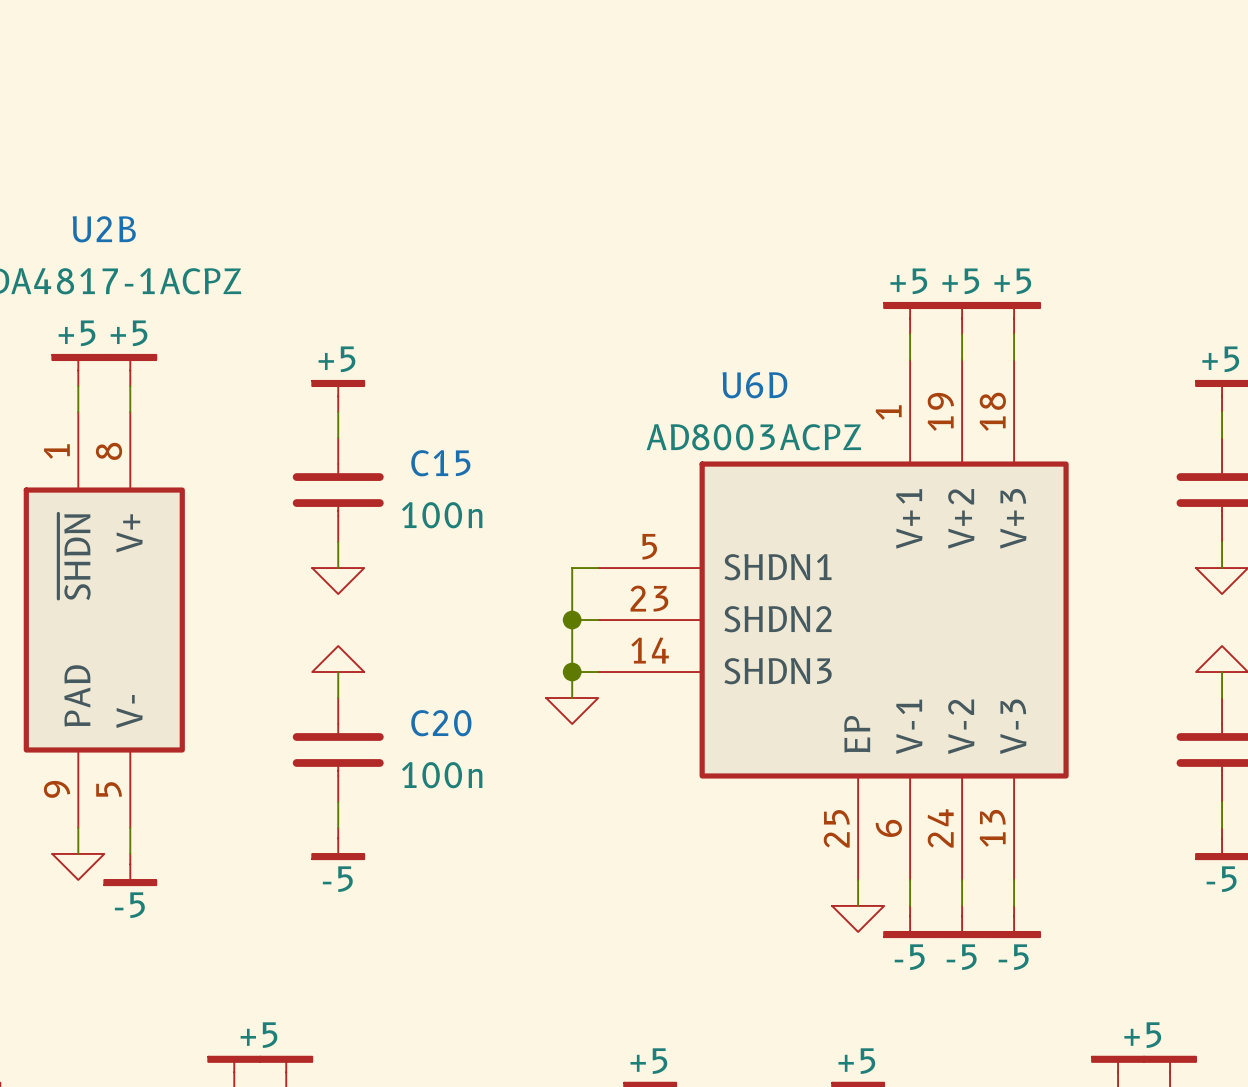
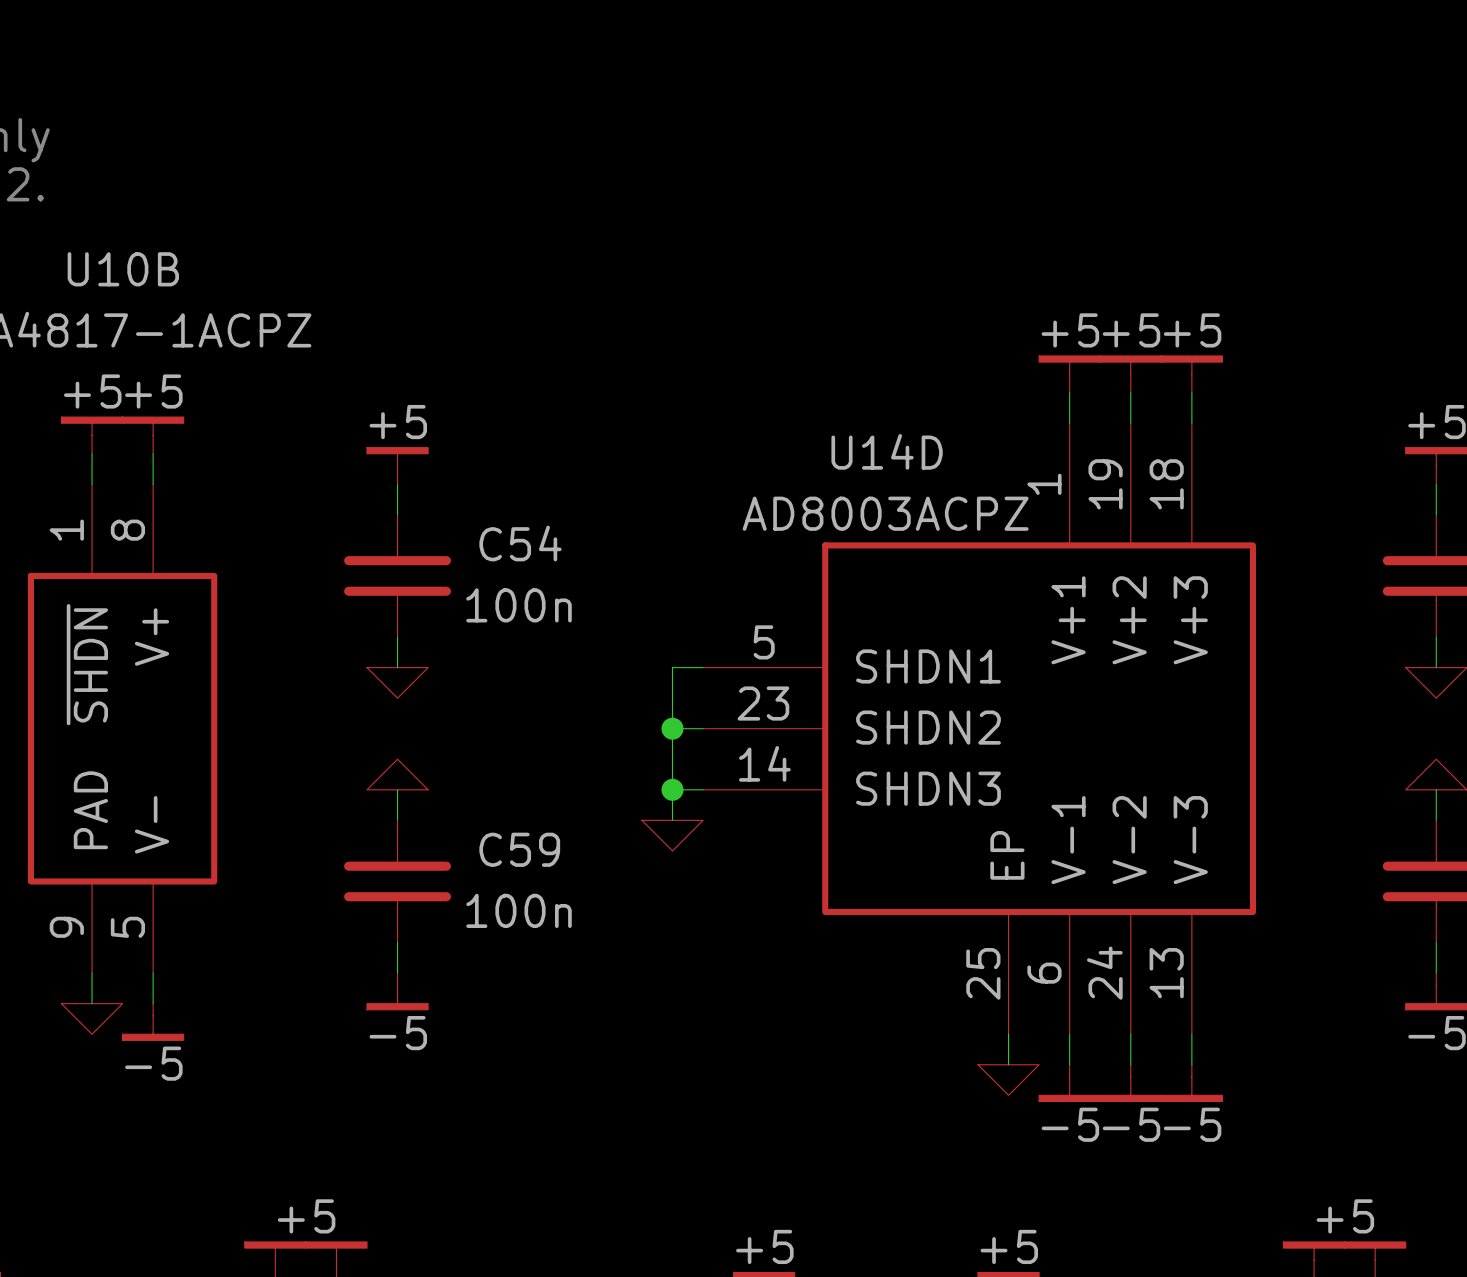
U2B name: U2B (104, 229) -> U10B (123, 269)
U6D name: U6D (754, 385) -> U14D (887, 451)
C15 name: C15 (440, 463) -> C54 (520, 543)
C20 name: C20 (441, 723) -> C59 (519, 849)

